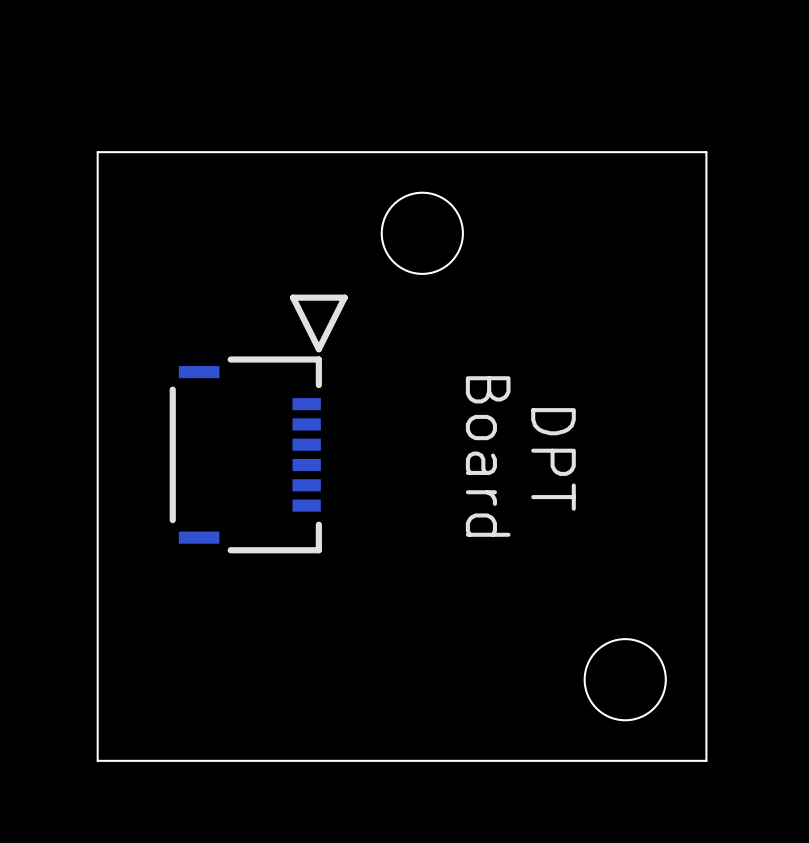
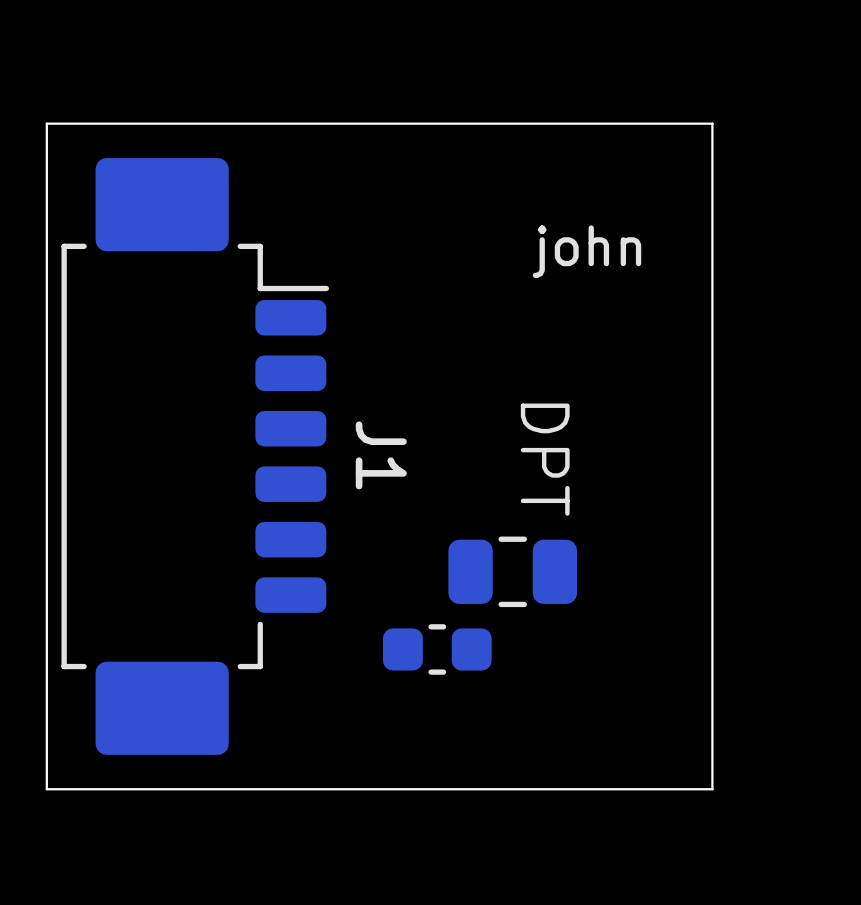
round board edge: [380, 191, 464, 275] -> none
text: none -> john (587, 251)
part: (258, 423) -> none
J1: none -> (195, 456)
text: Board (488, 456) -> none
part: none -> (512, 571)
part: none -> (437, 649)
round board edge: [583, 638, 667, 722] -> none

